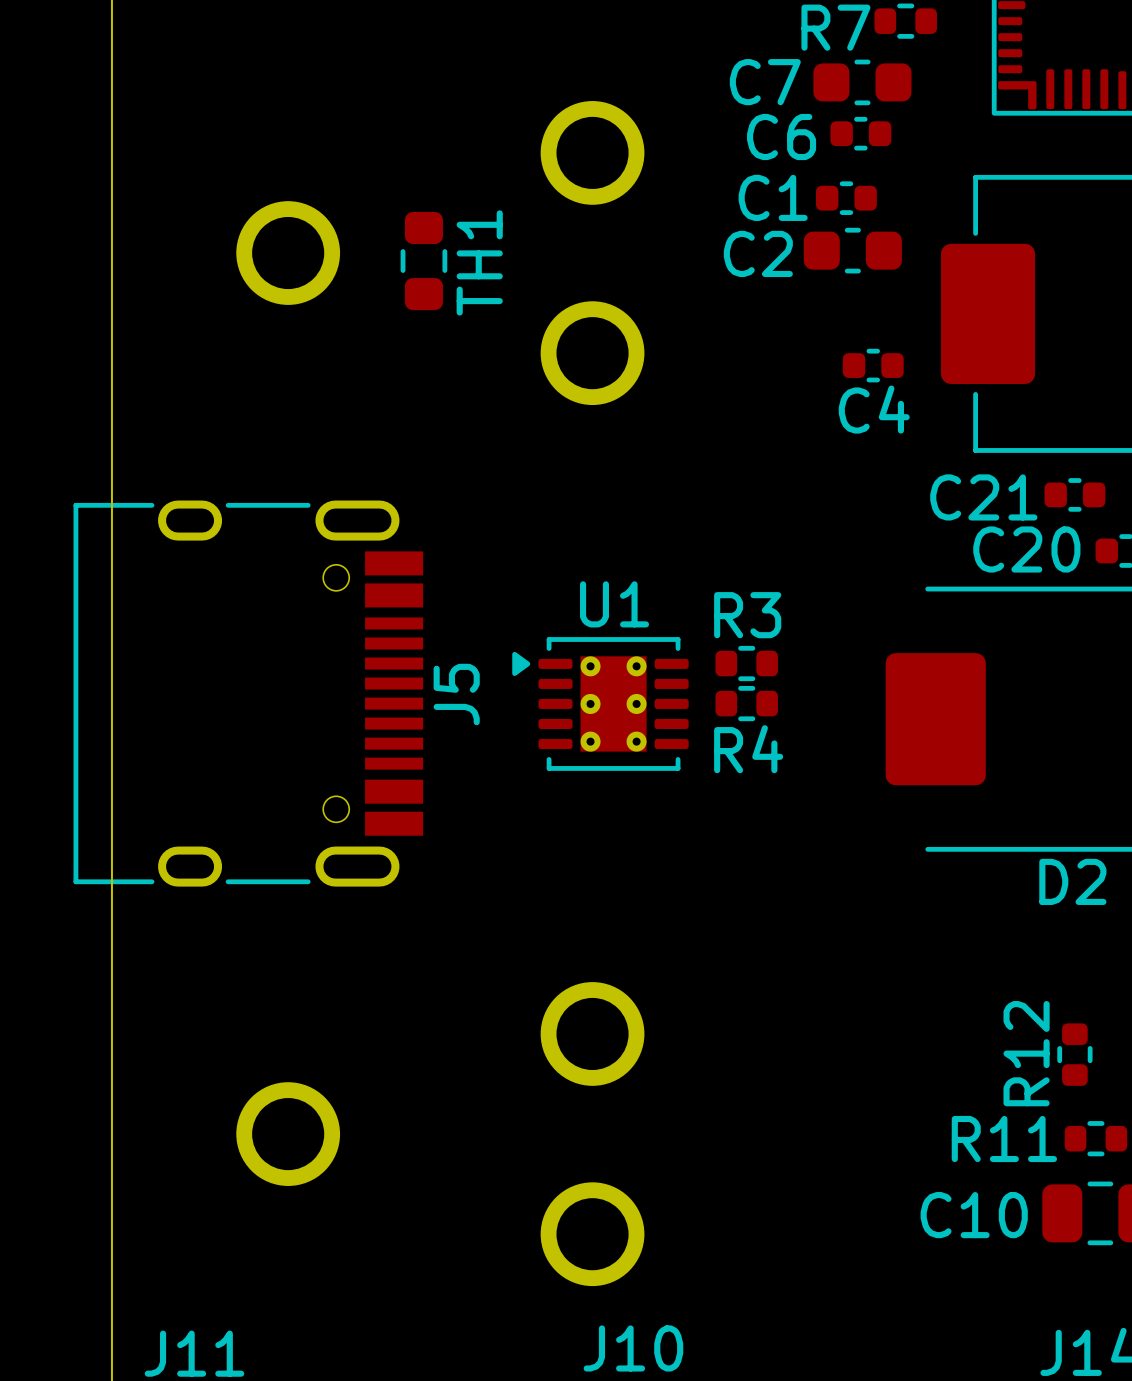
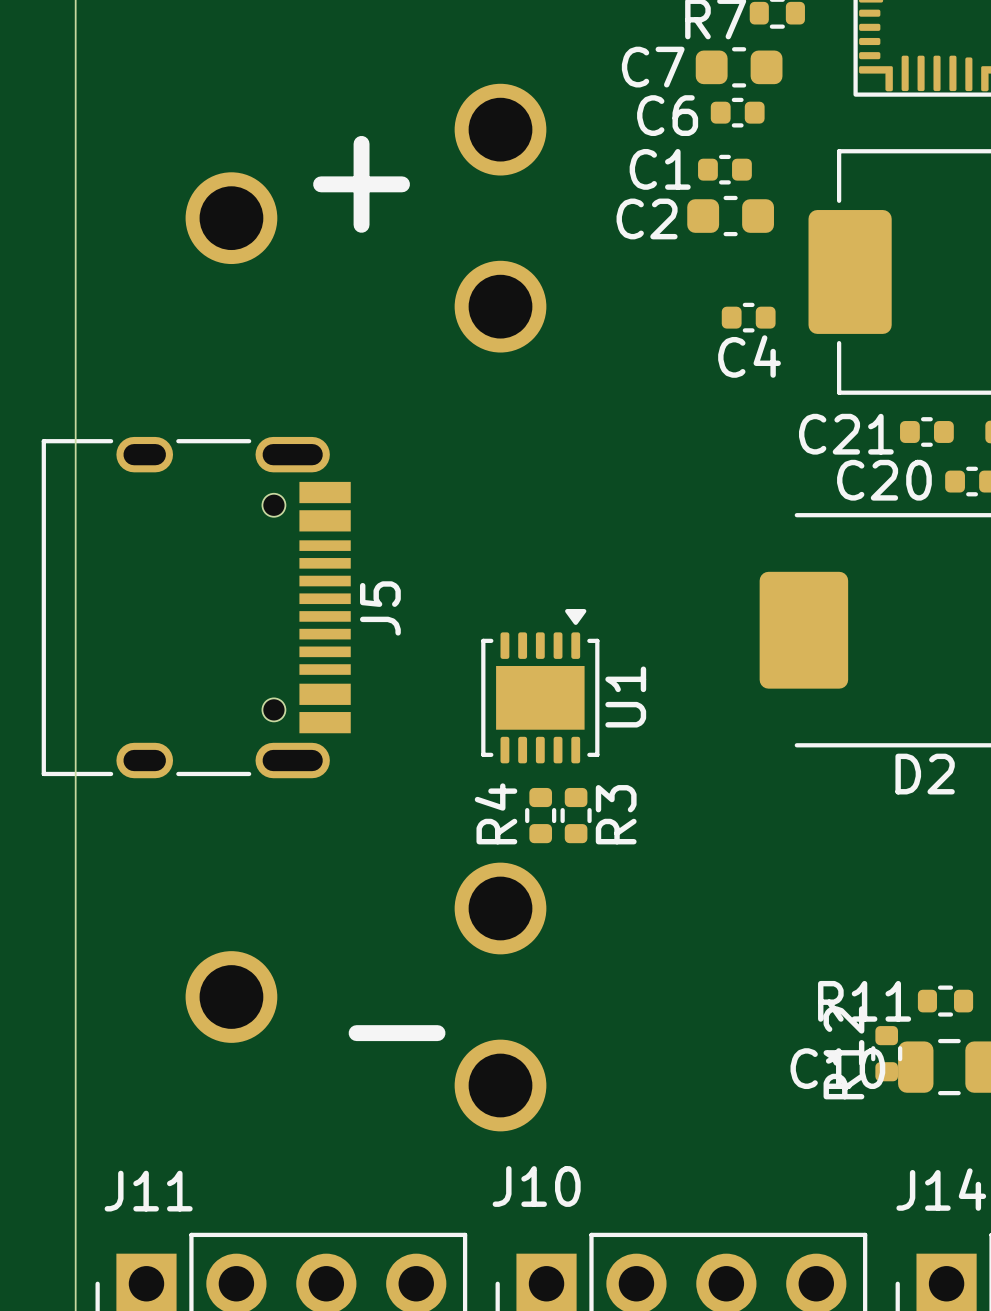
text: none -> + (361, 184)
TH1: (423, 261) -> none
U1 name position: U1 (614, 604) -> U1 (625, 697)
U1 footprint: [512, 637, 689, 771] -> [481, 608, 600, 764]
R3 rotation: 0° (746, 663) -> 90° clockwise (576, 815)
R3 position: (746, 663) -> (576, 815)
R4 rotation: 0° (746, 703) -> 90° clockwise (540, 815)
R4 position: (746, 703) -> (540, 815)
R12 position: (1074, 1054) -> (886, 1053)
text: none -> - (397, 1033)

